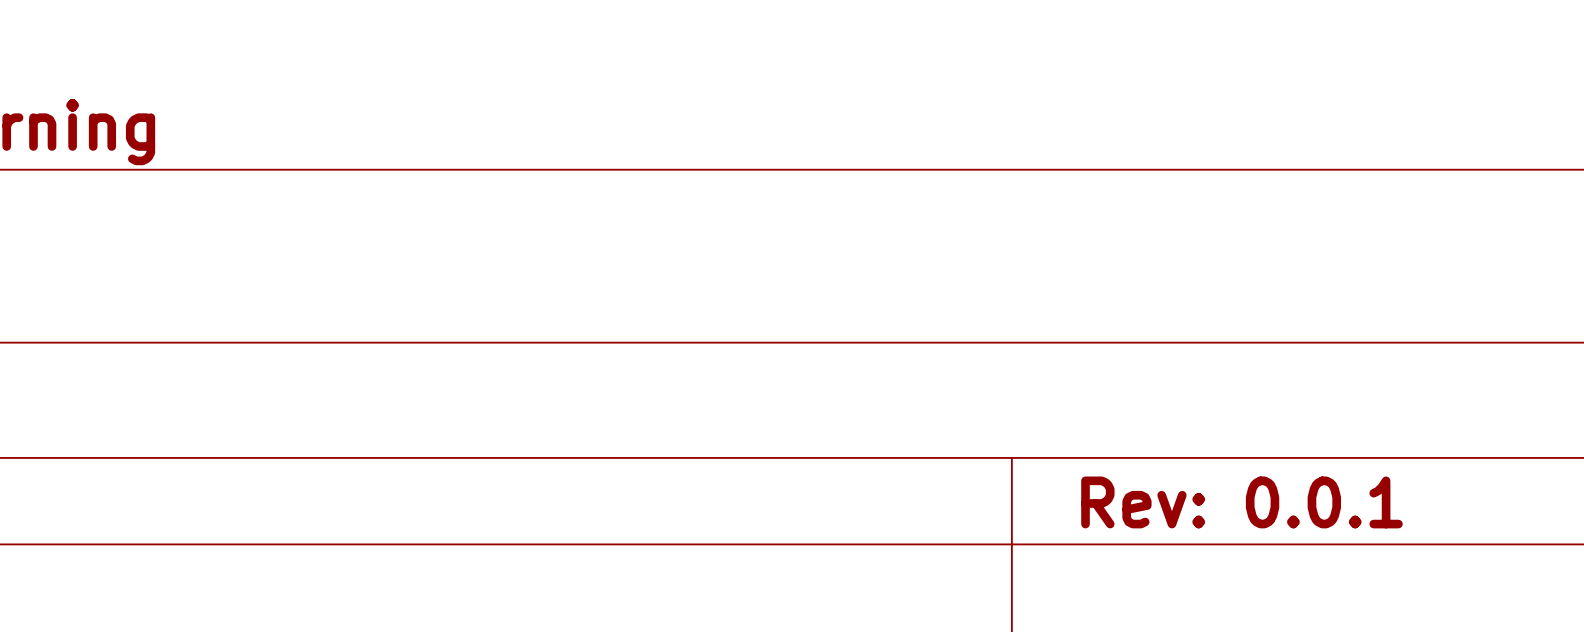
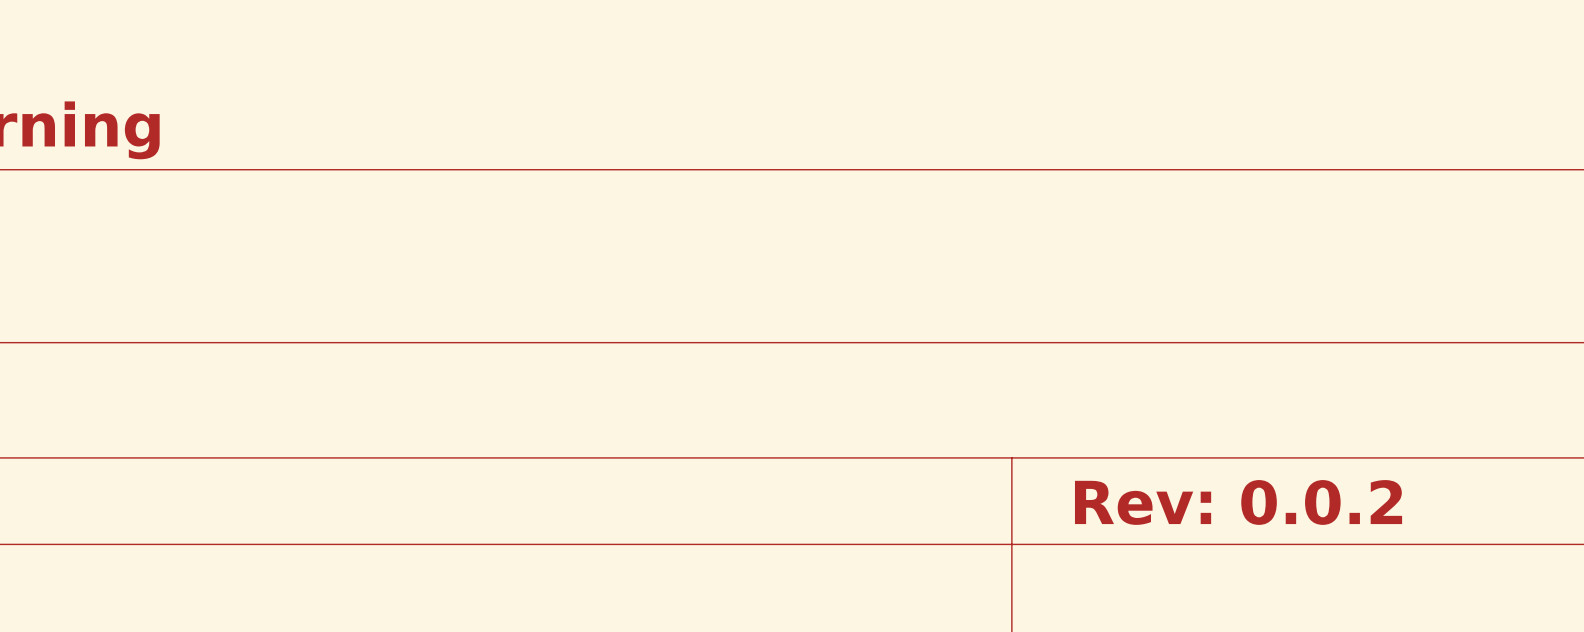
title block: Rev: 0.0.1 (1241, 502) -> Rev: 0.0.2 (1238, 502)

